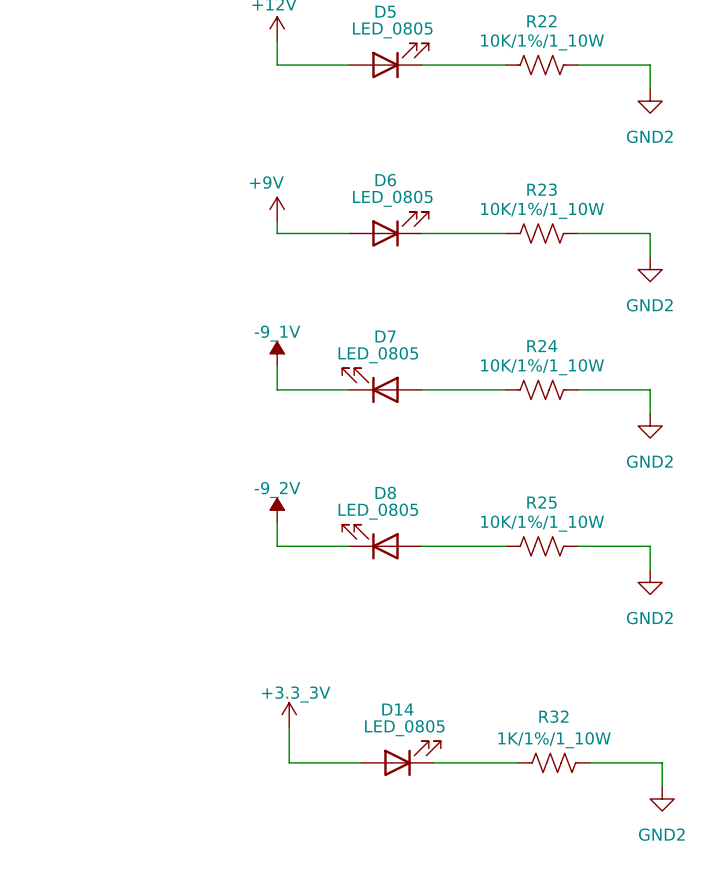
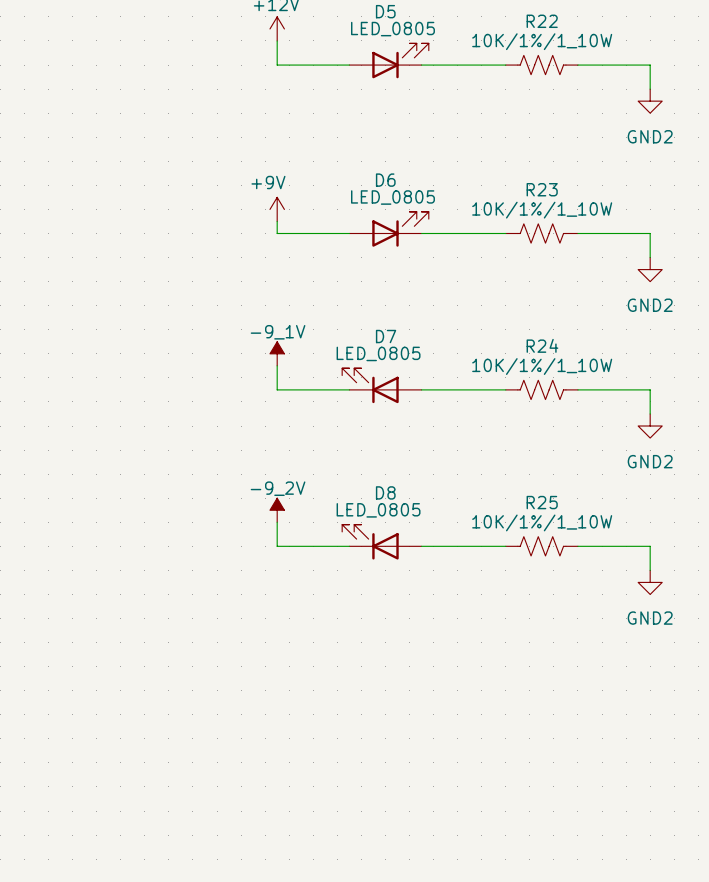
power symbol: +3.3_3V (289, 714) -> none
wire: (289, 726) (289, 762) (361, 762) -> none
D14: LED_0805 (401, 758) -> none
wire: (433, 762) (517, 762) -> none
R32: 1K/1%/1_10W (553, 762) -> none
wire: (590, 762) (662, 762) (662, 786) -> none
power symbol: GND2 (662, 798) -> none

